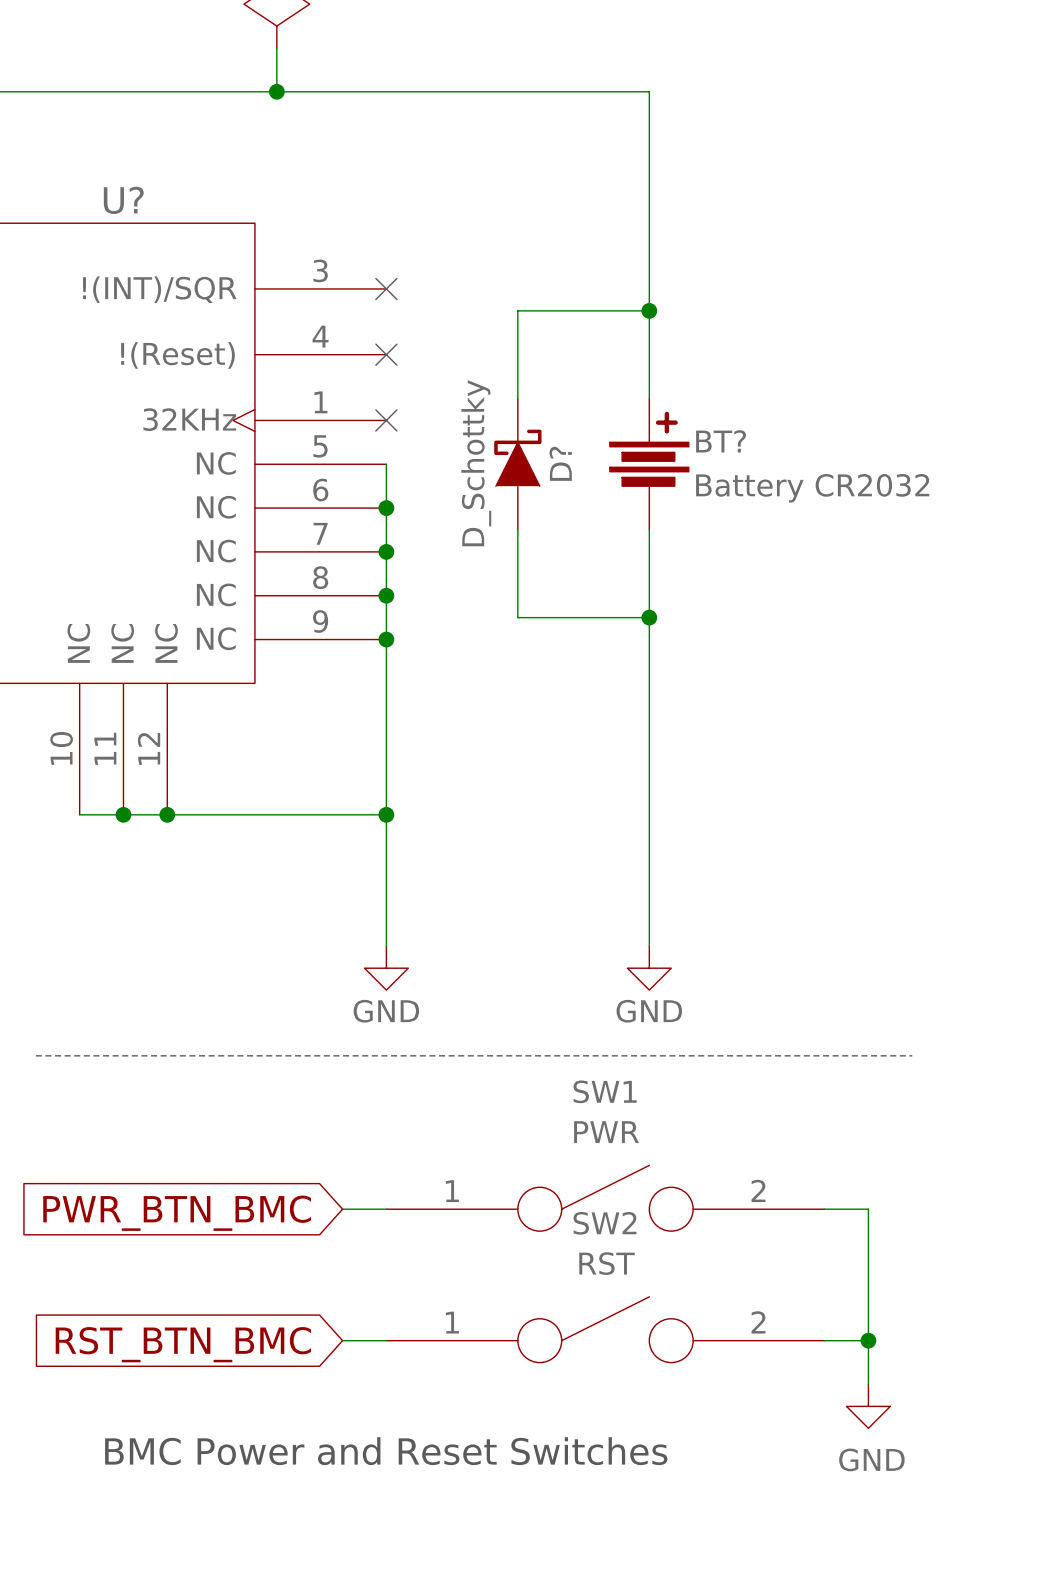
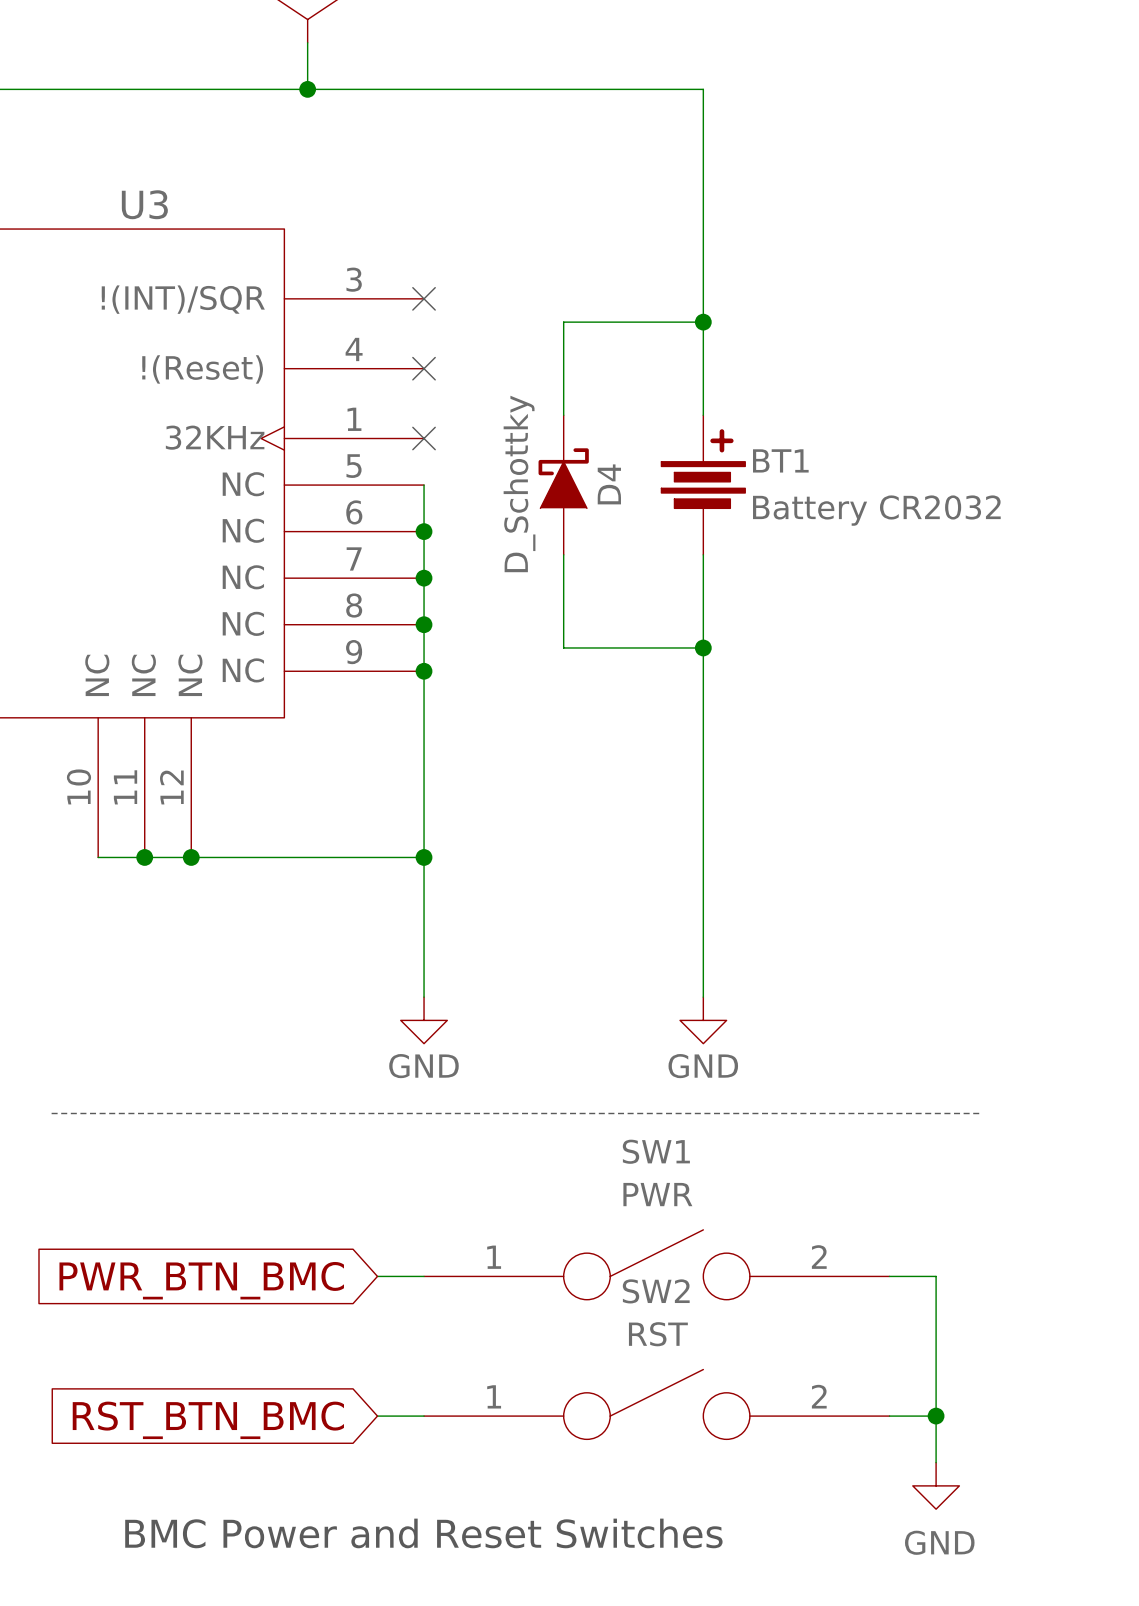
U? name: U? (123, 200) -> U3 (144, 204)
BT? name: BT? (721, 441) -> BT1 (780, 460)
D? name: D? (560, 463) -> D4 (609, 484)

